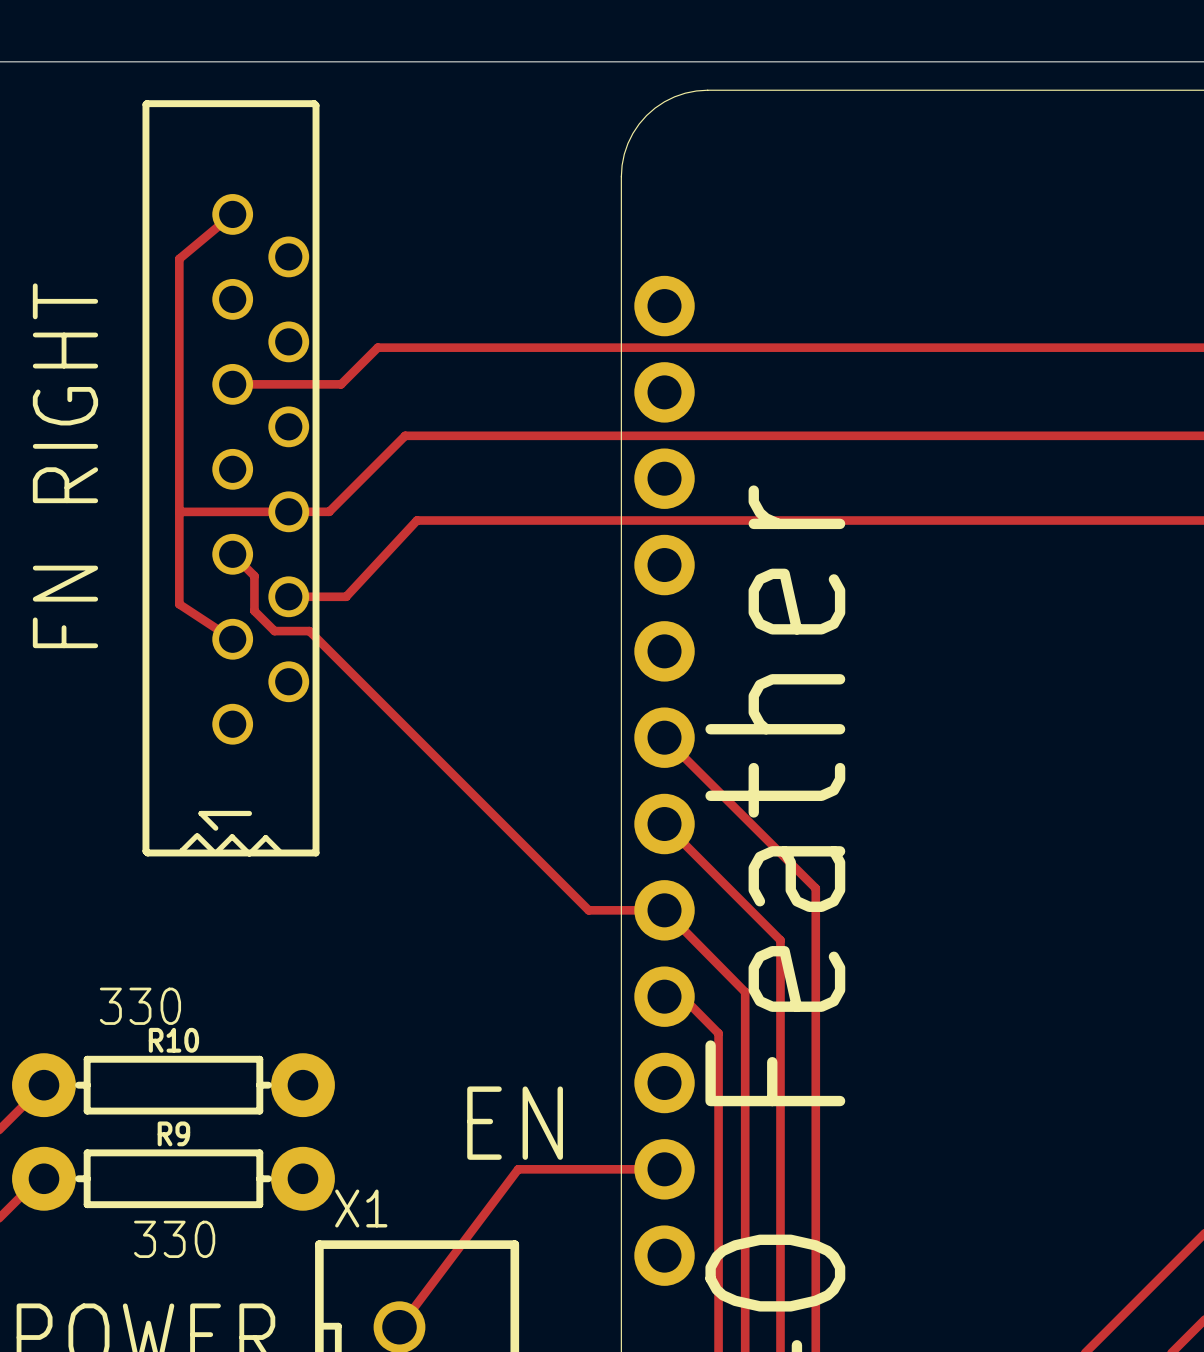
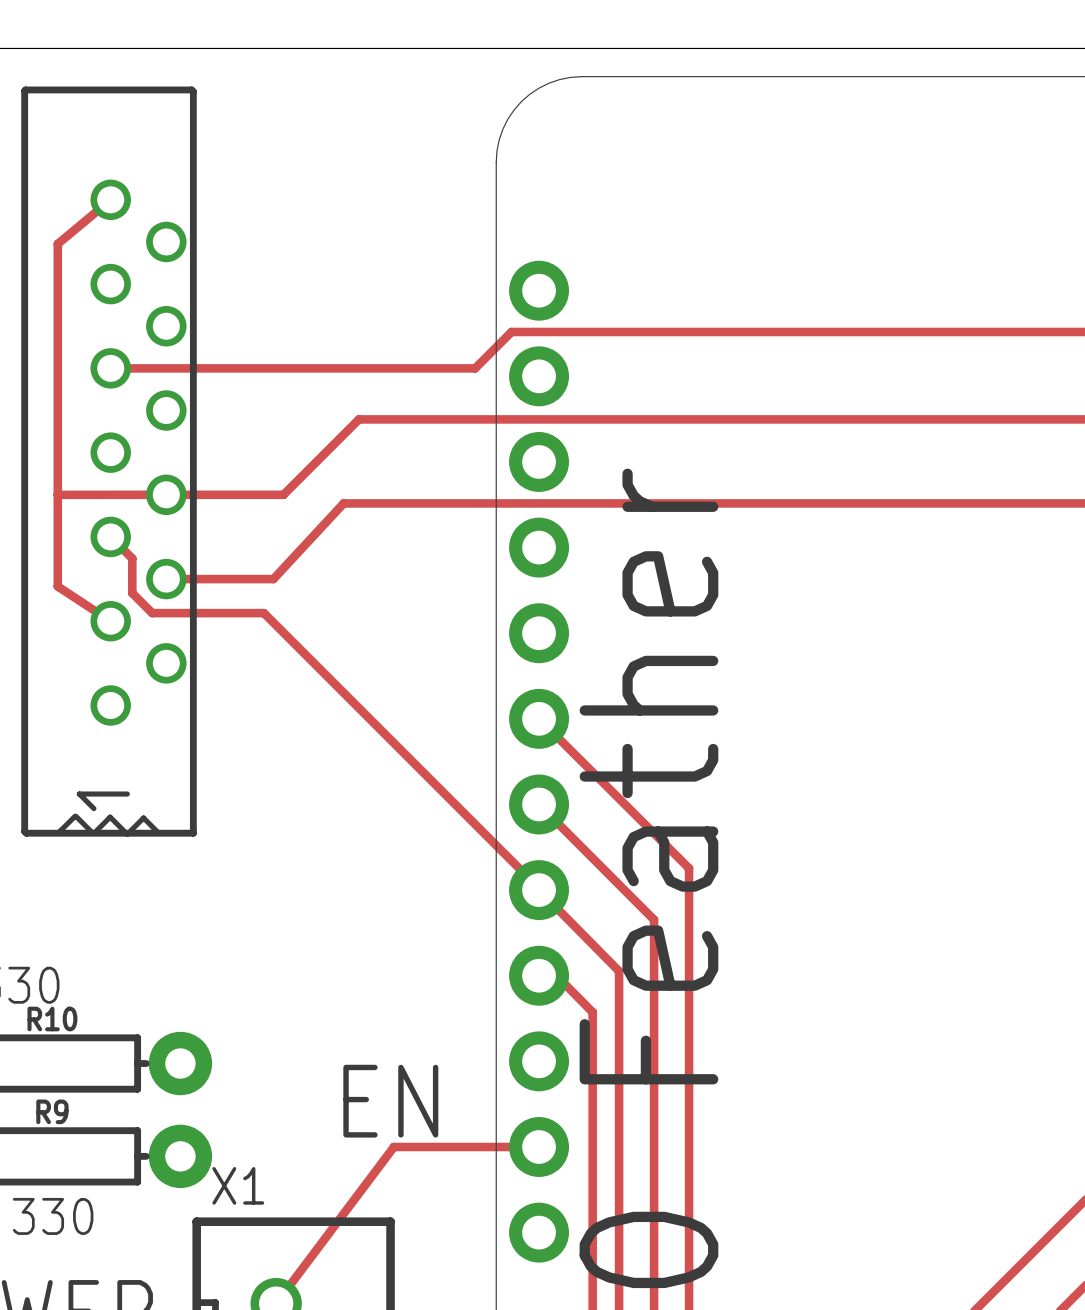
track: (636, 347) (377, 347) (341, 384) -> (511, 331) (475, 368) (218, 368)
track: (482, 435) (405, 435) (329, 511) -> (358, 419) (283, 494) (206, 494)
track: (467, 520) (416, 520) (346, 596) -> (343, 503) (273, 579) (223, 579)
track: (309, 631) (588, 910) (664, 910) -> (186, 613) (263, 613) (539, 890)

